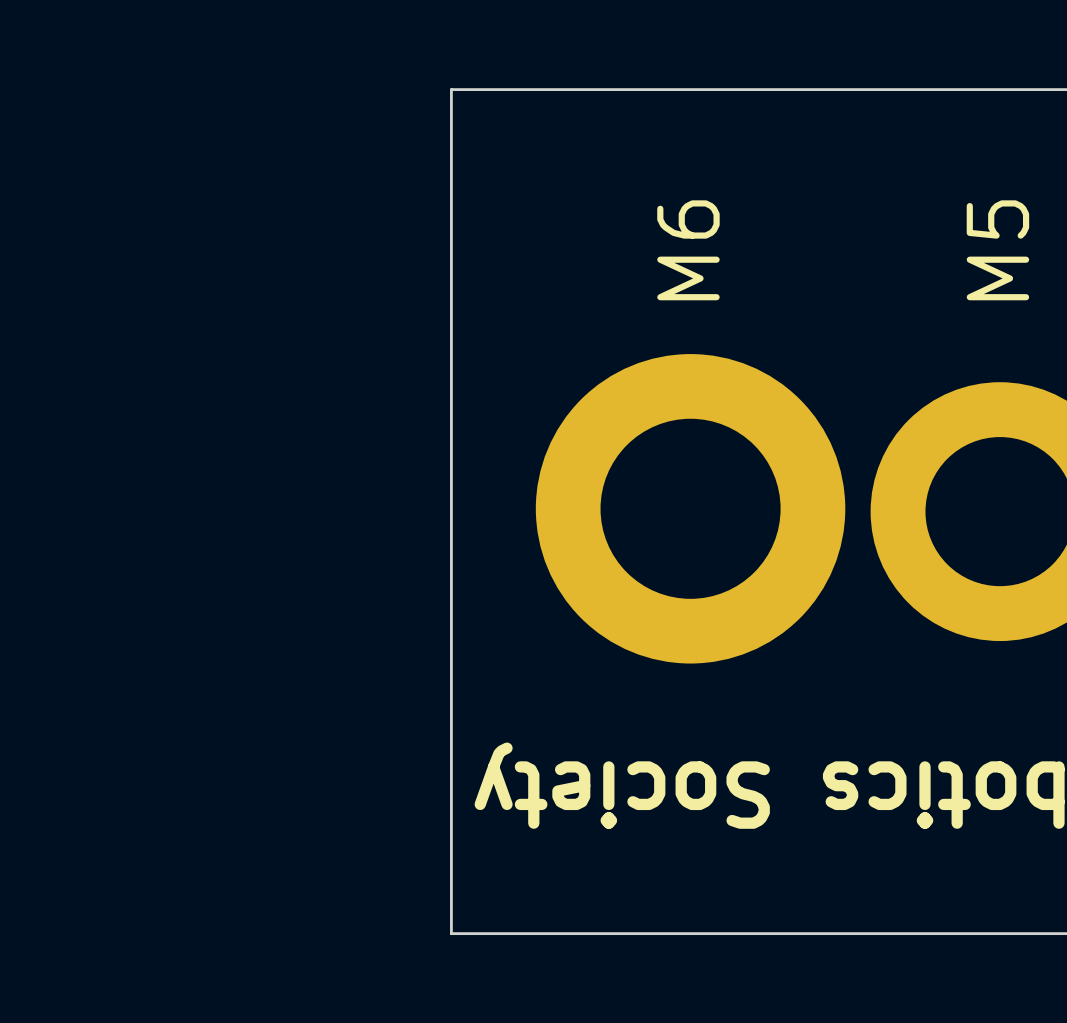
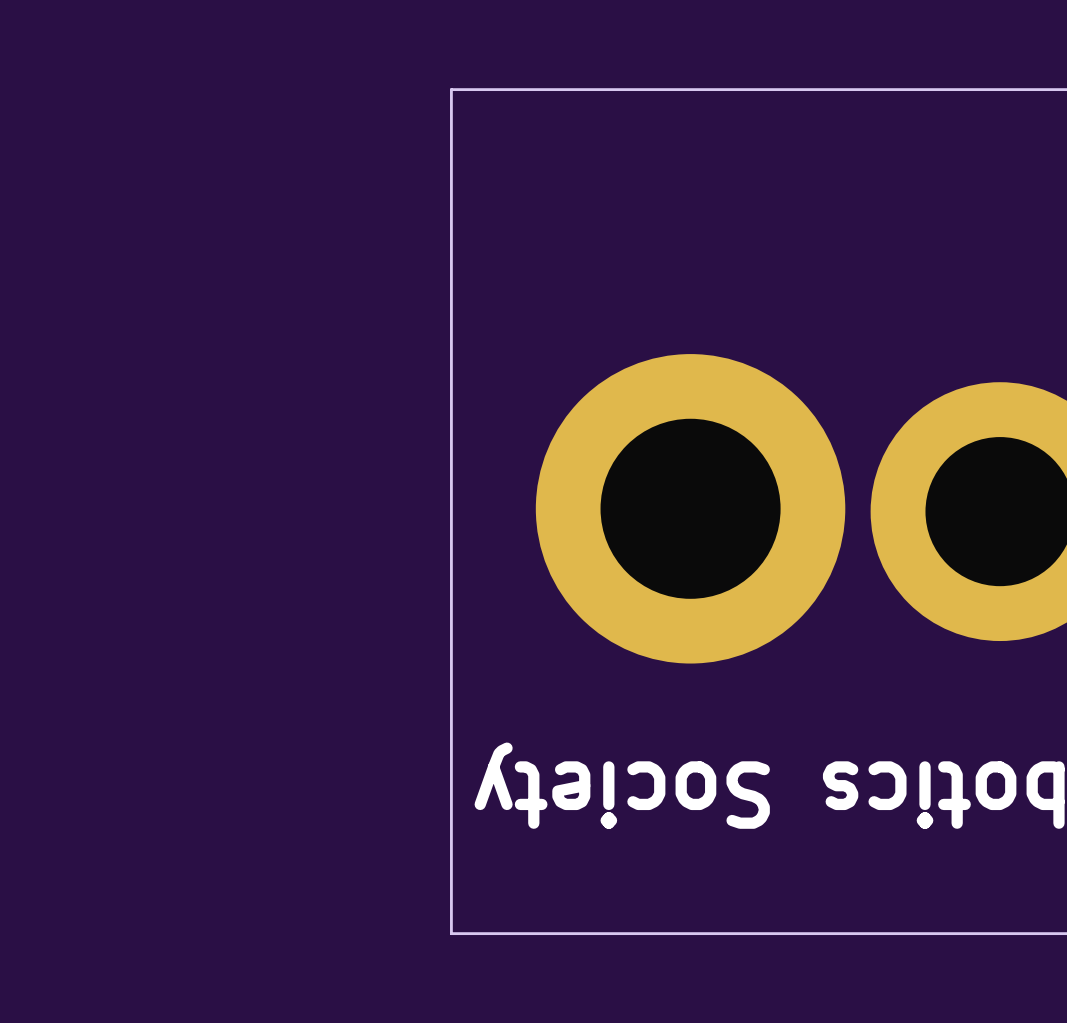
text: M6 (688, 250) -> none
text: M5 (997, 250) -> none

